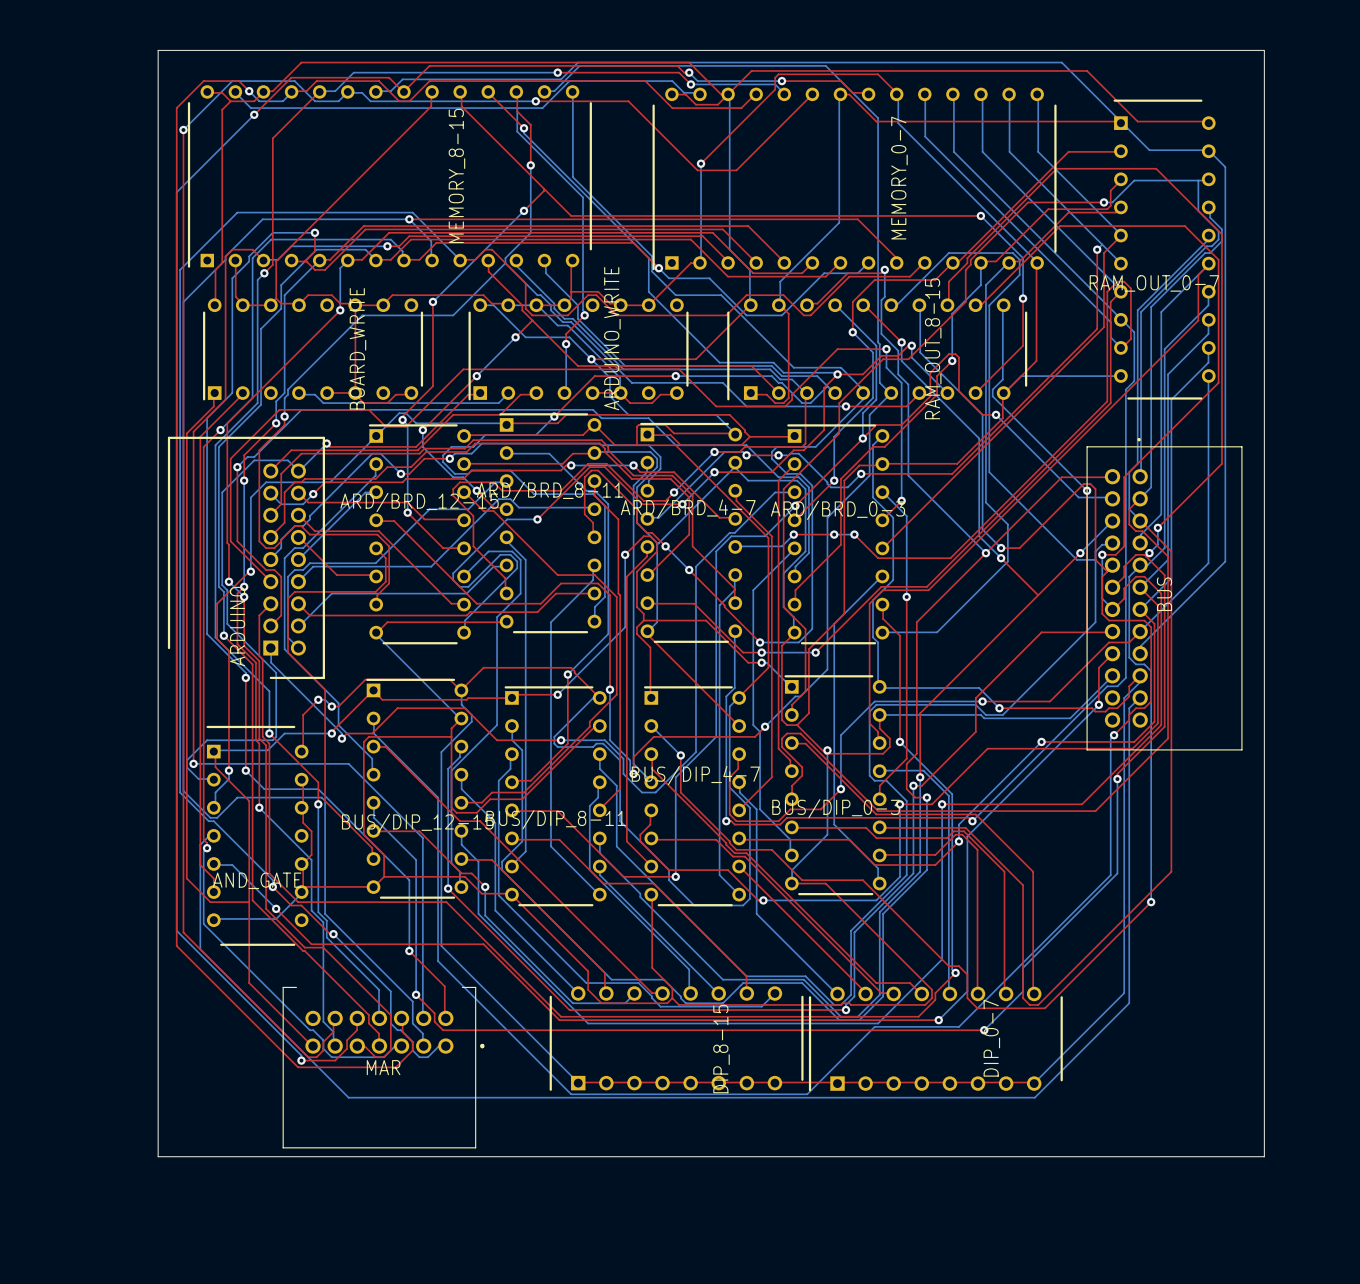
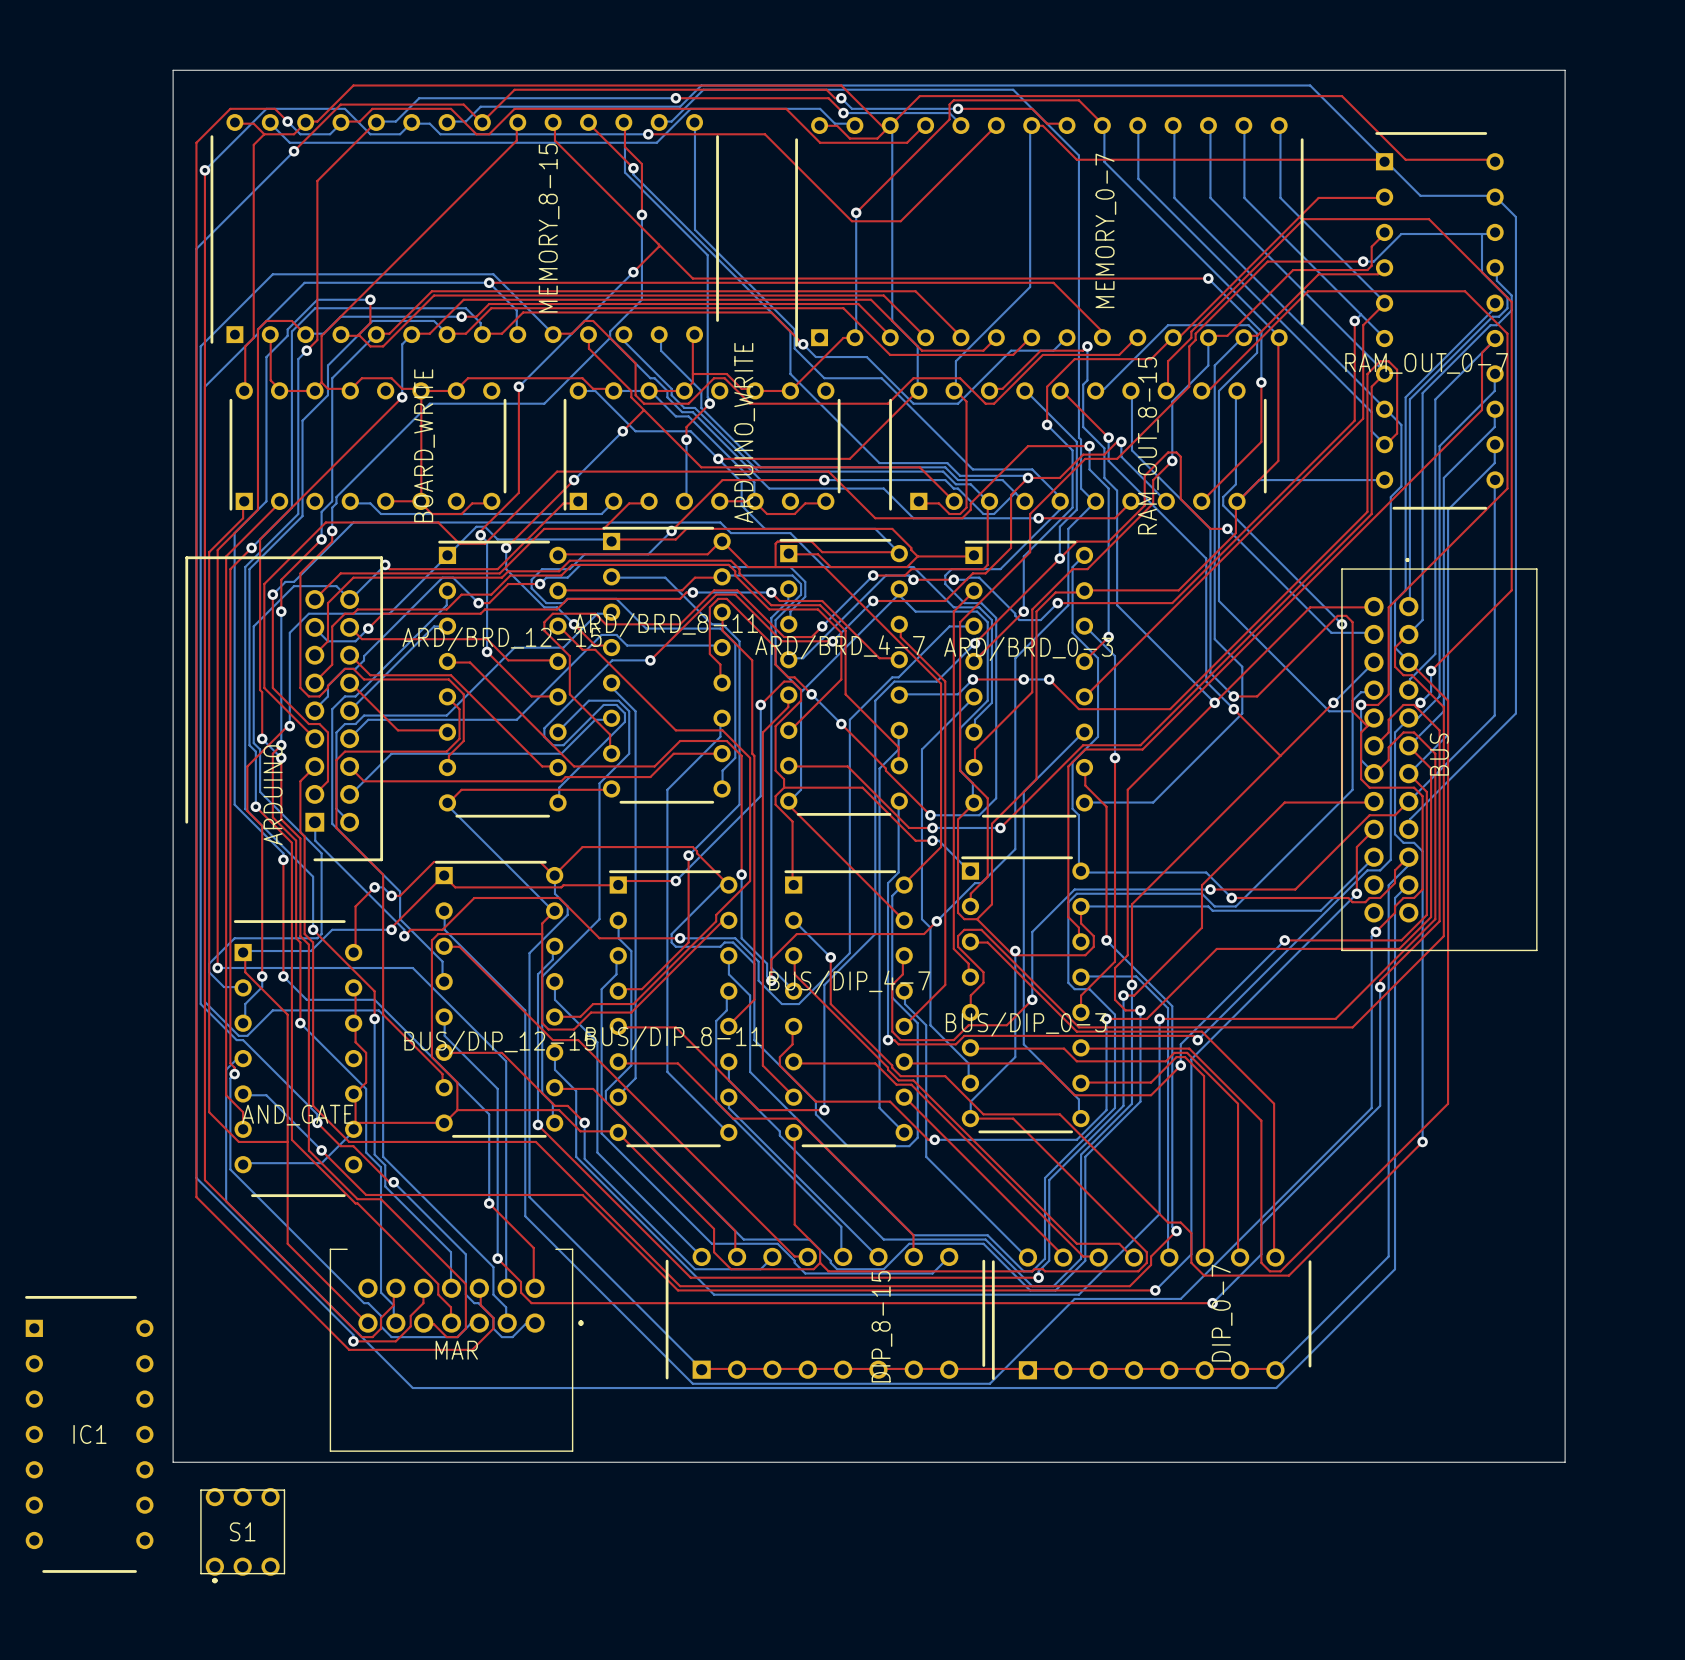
IC1: none -> (89, 1434)
S1: none -> (242, 1535)

